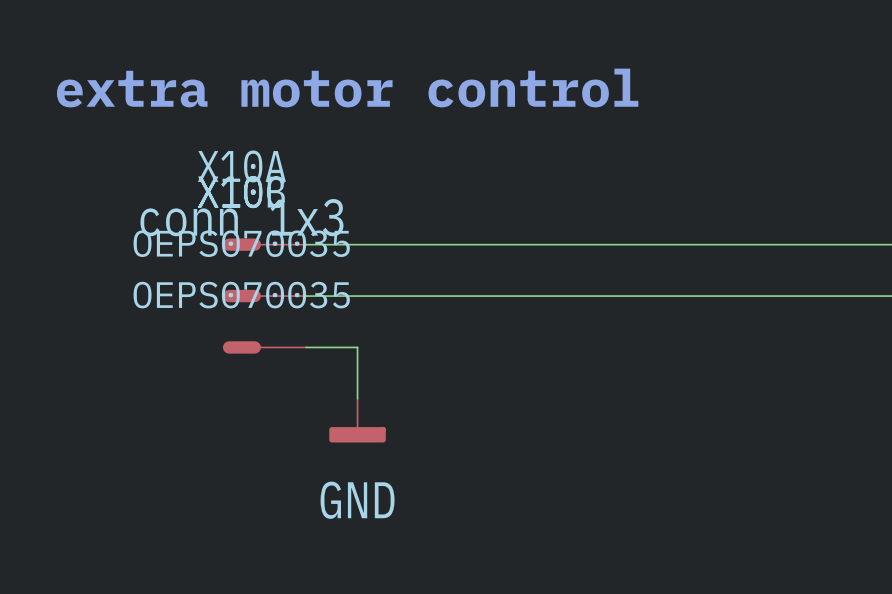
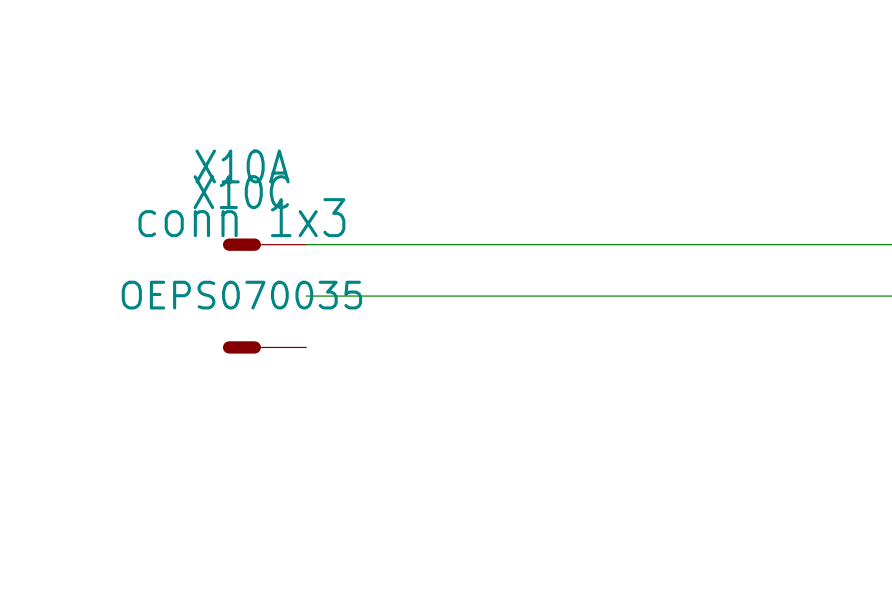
text: extra motor control (347, 88) -> none
part: (264, 296) -> none
wire: (306, 347) (357, 347) (357, 398) -> none
power symbol: GND (357, 420) -> none

